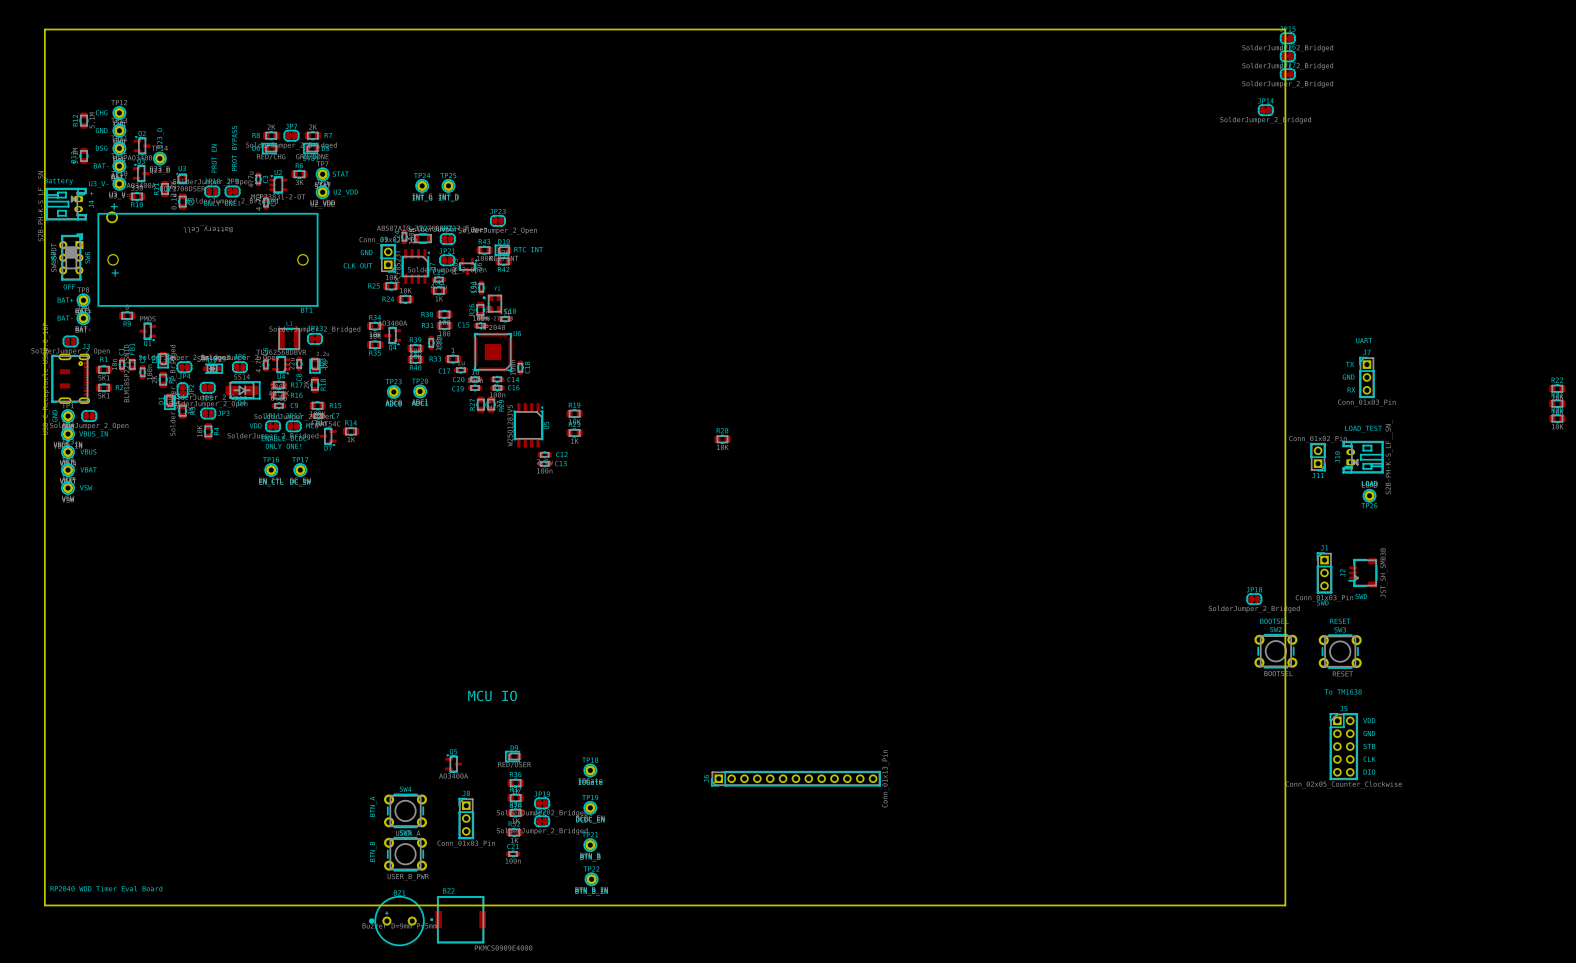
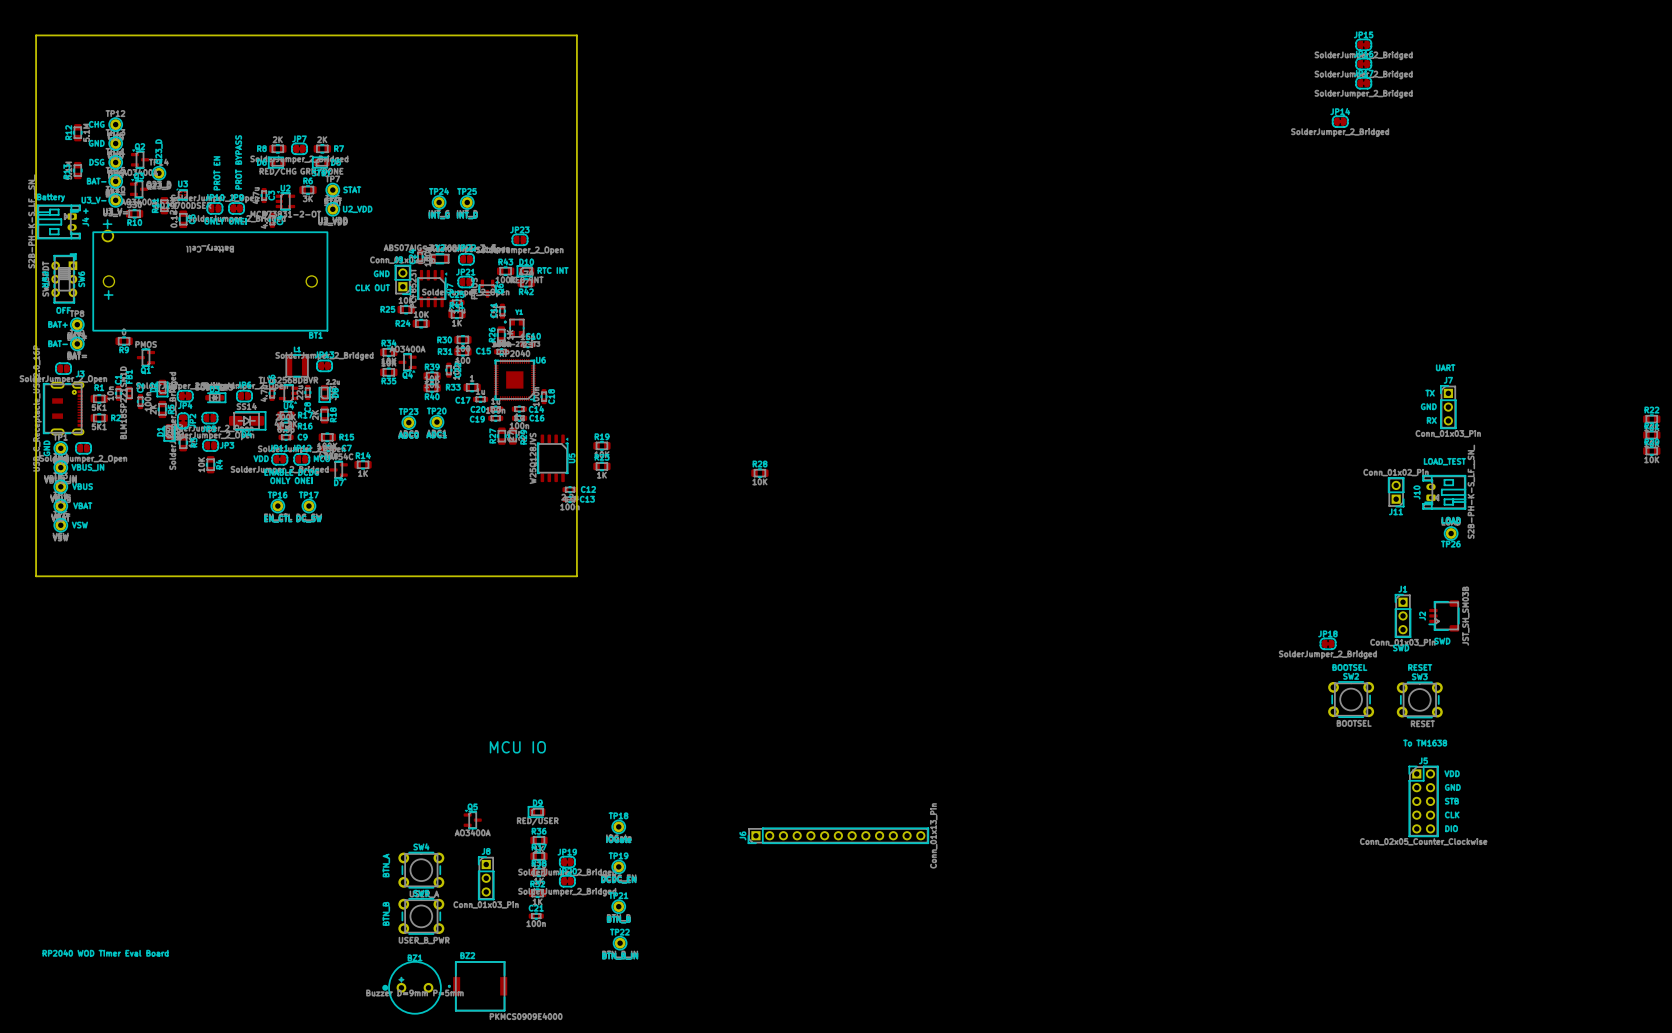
board edge: (551, 29) (1285, 29) (1285, 905) (44, 905) (44, 535) -> (576, 35) (576, 576) (36, 576)

